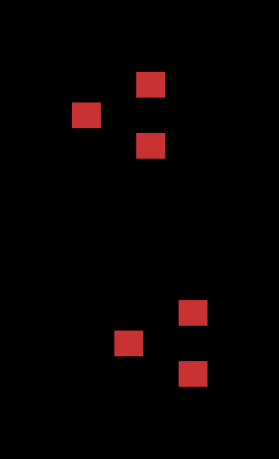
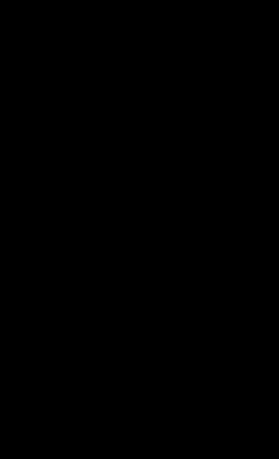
part: (118, 115) -> none
part: (160, 343) -> none

